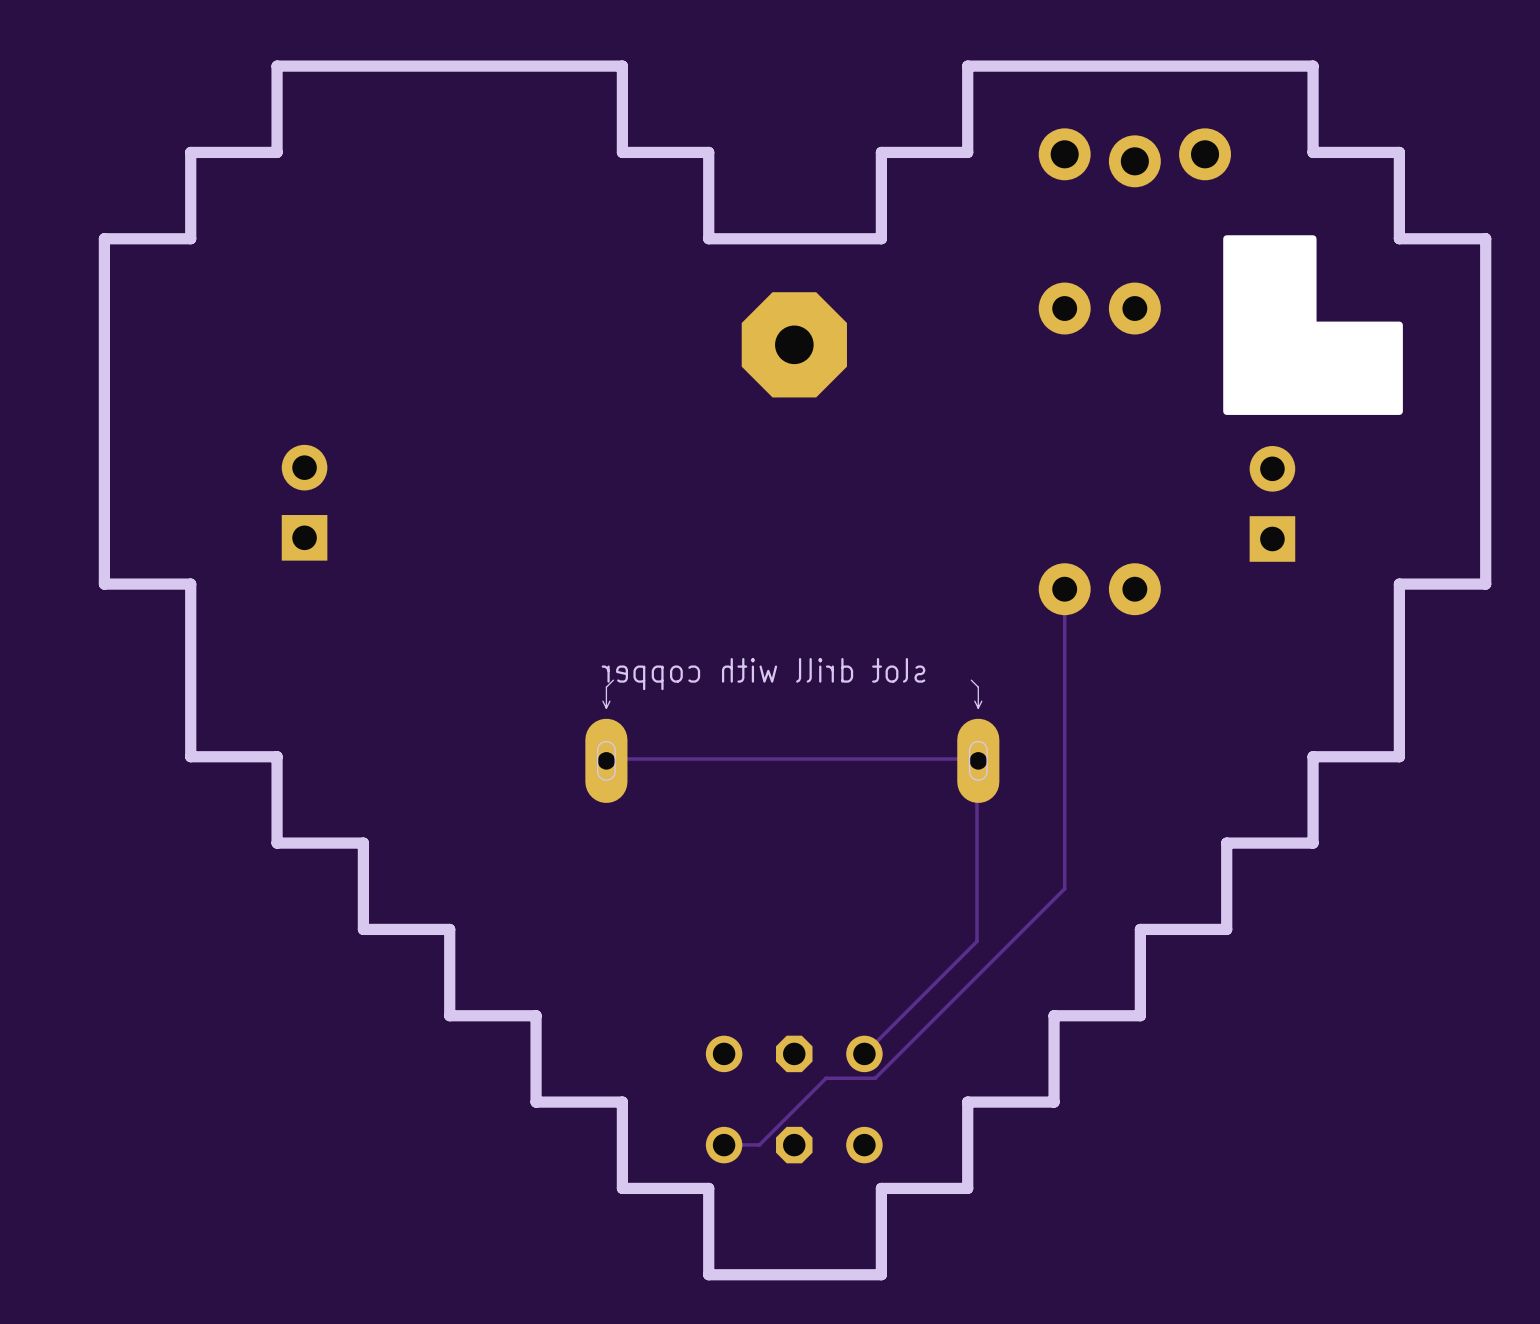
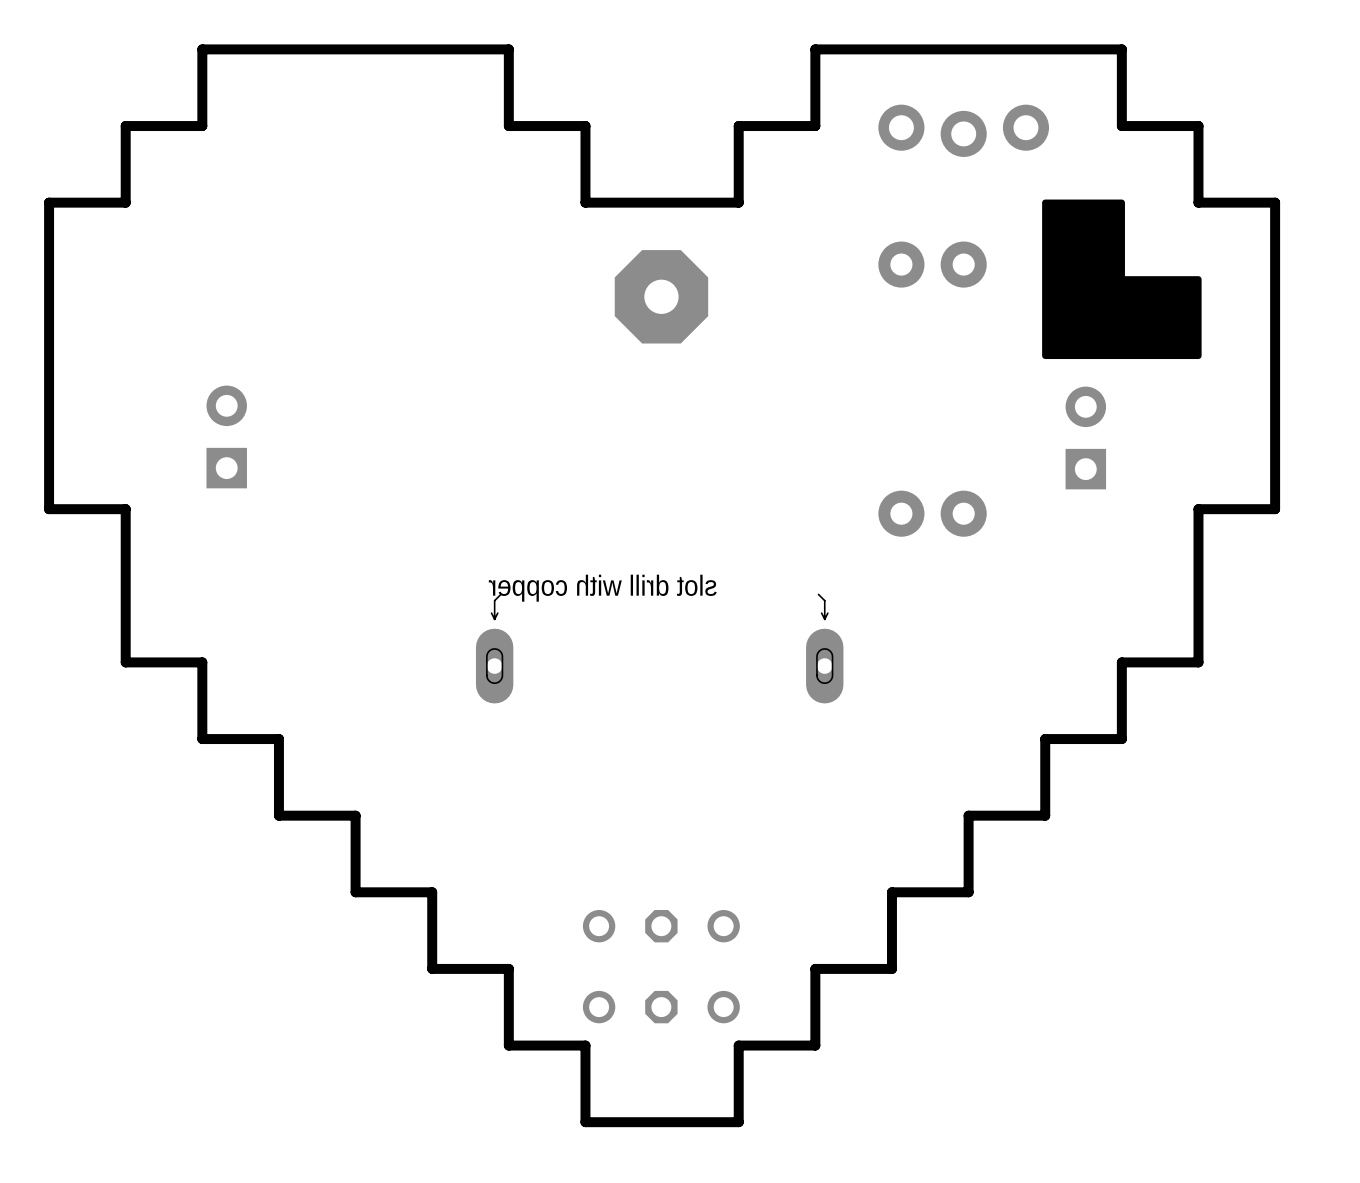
track: (1064, 589) (1064, 888) (875, 1078) (826, 1078) (759, 1144) (724, 1144) -> none
track: (606, 760) (608, 758) (976, 758) (976, 941) (864, 1053) -> none

